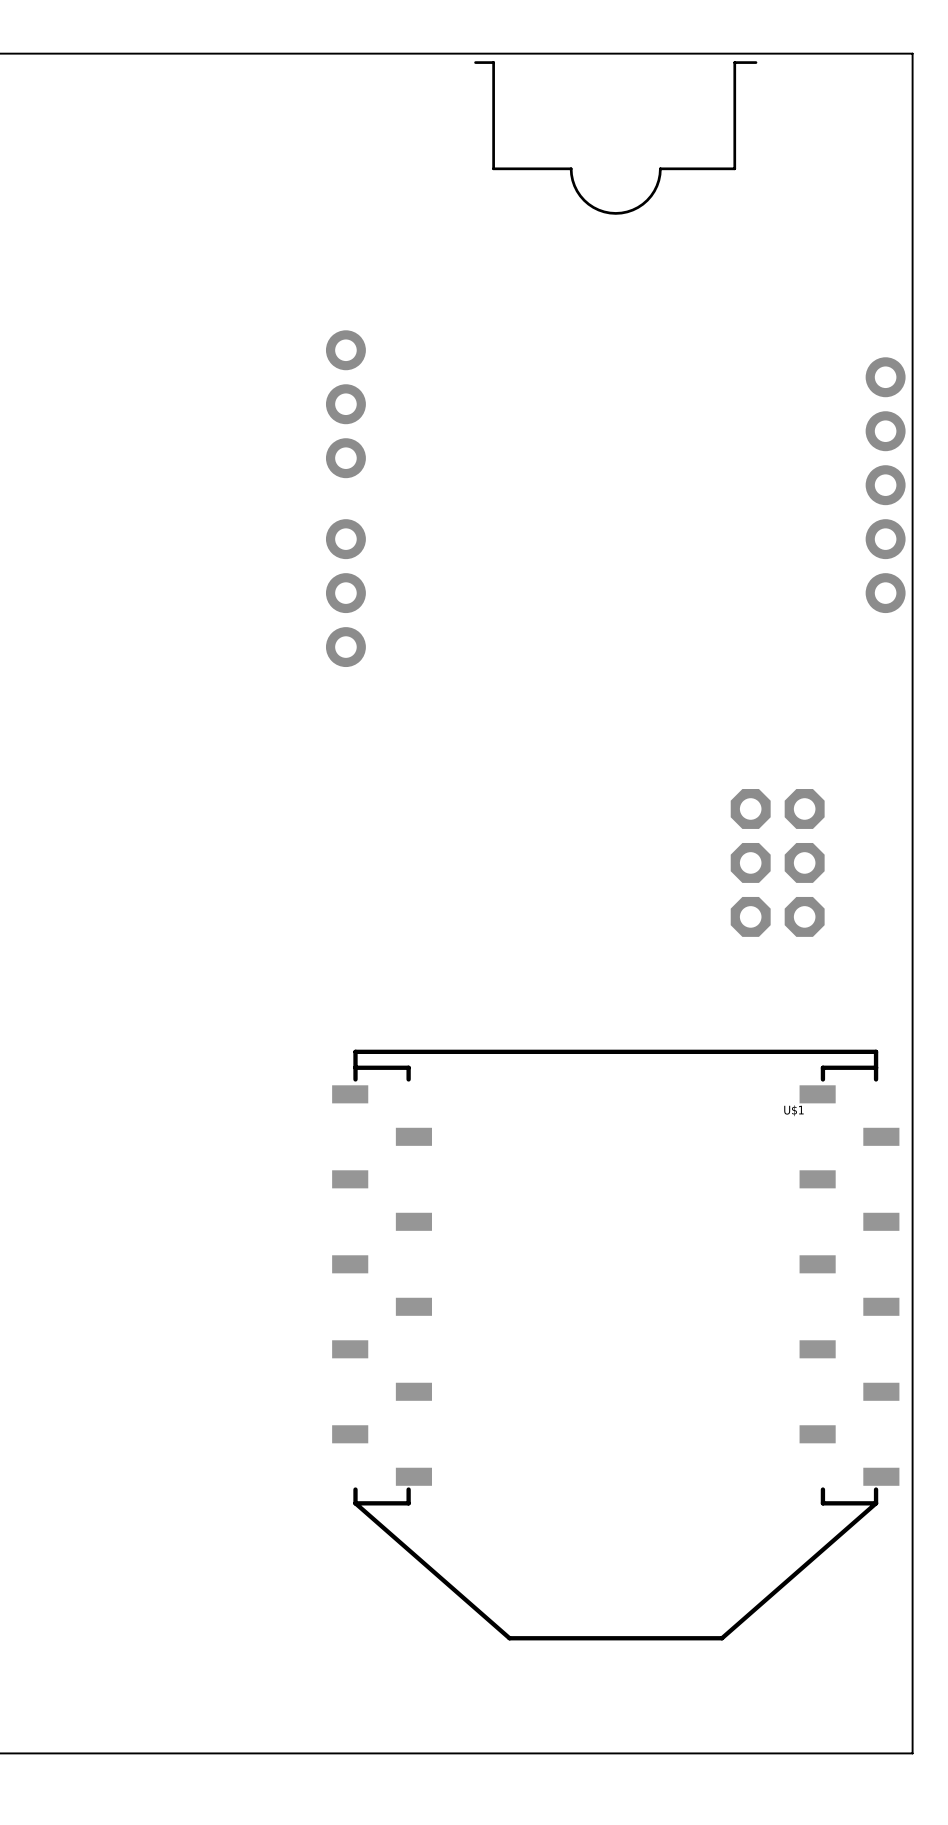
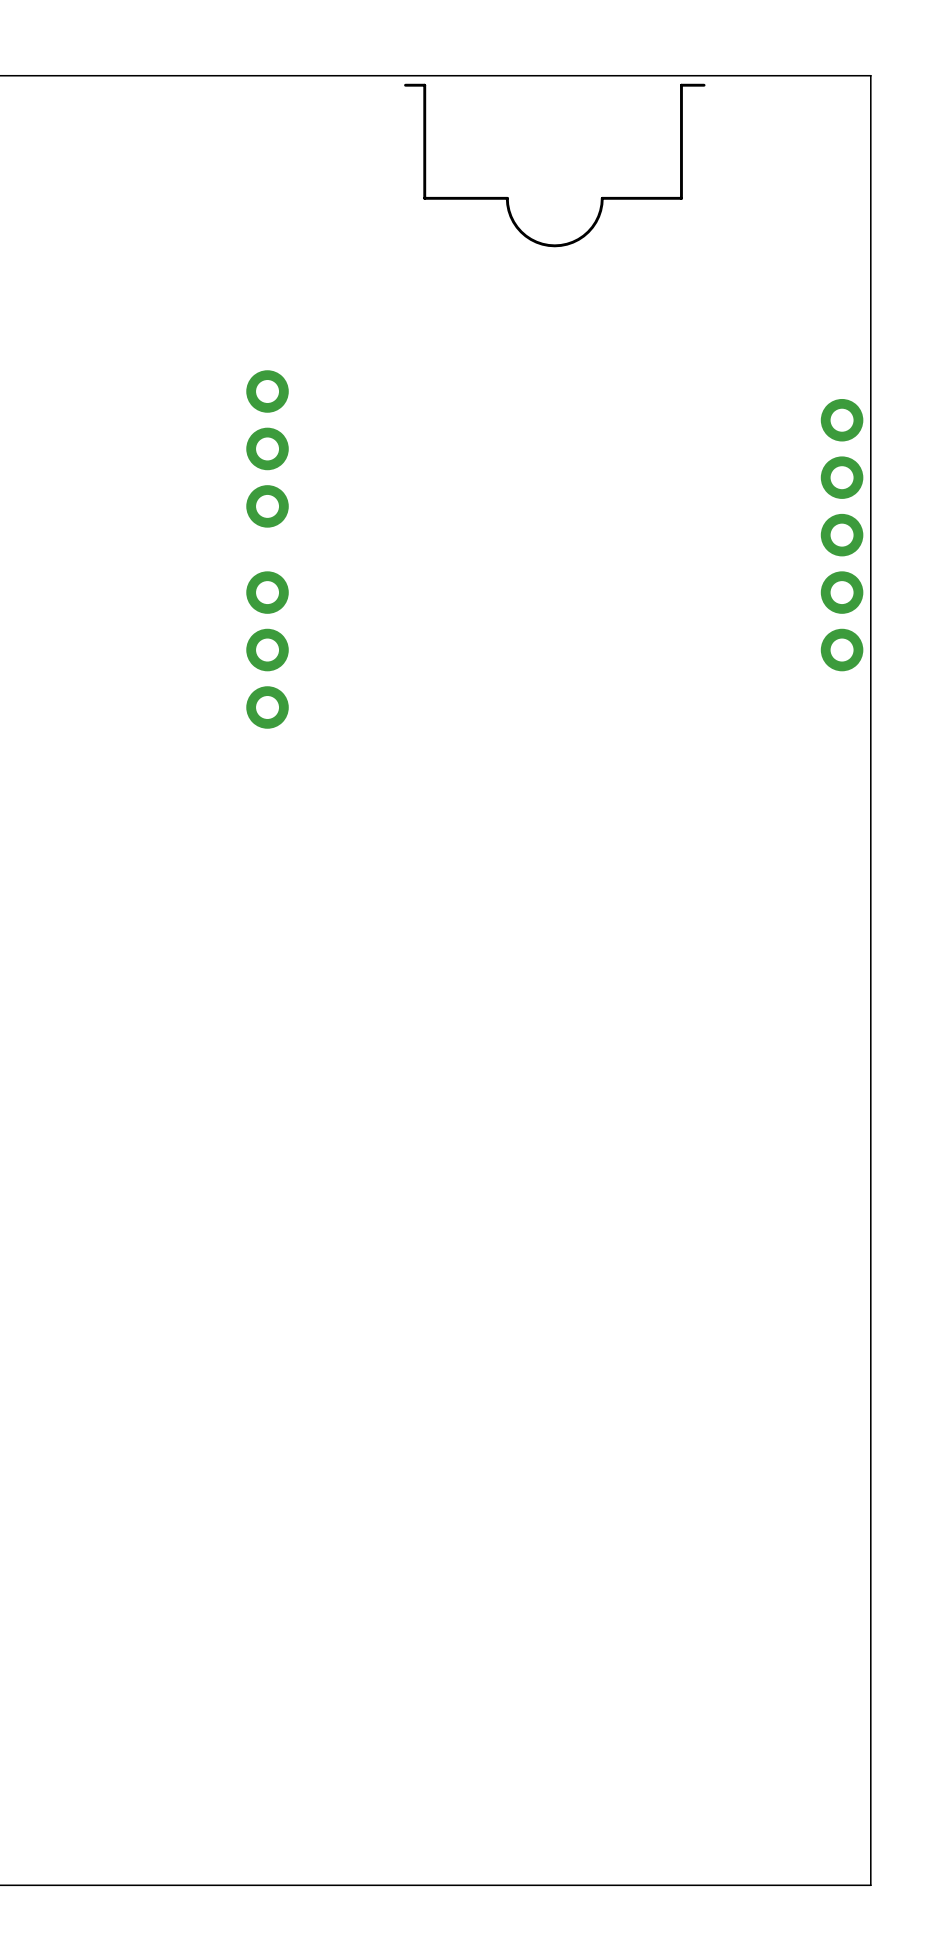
part: (777, 862) -> none
U$1: (615, 1345) -> none

